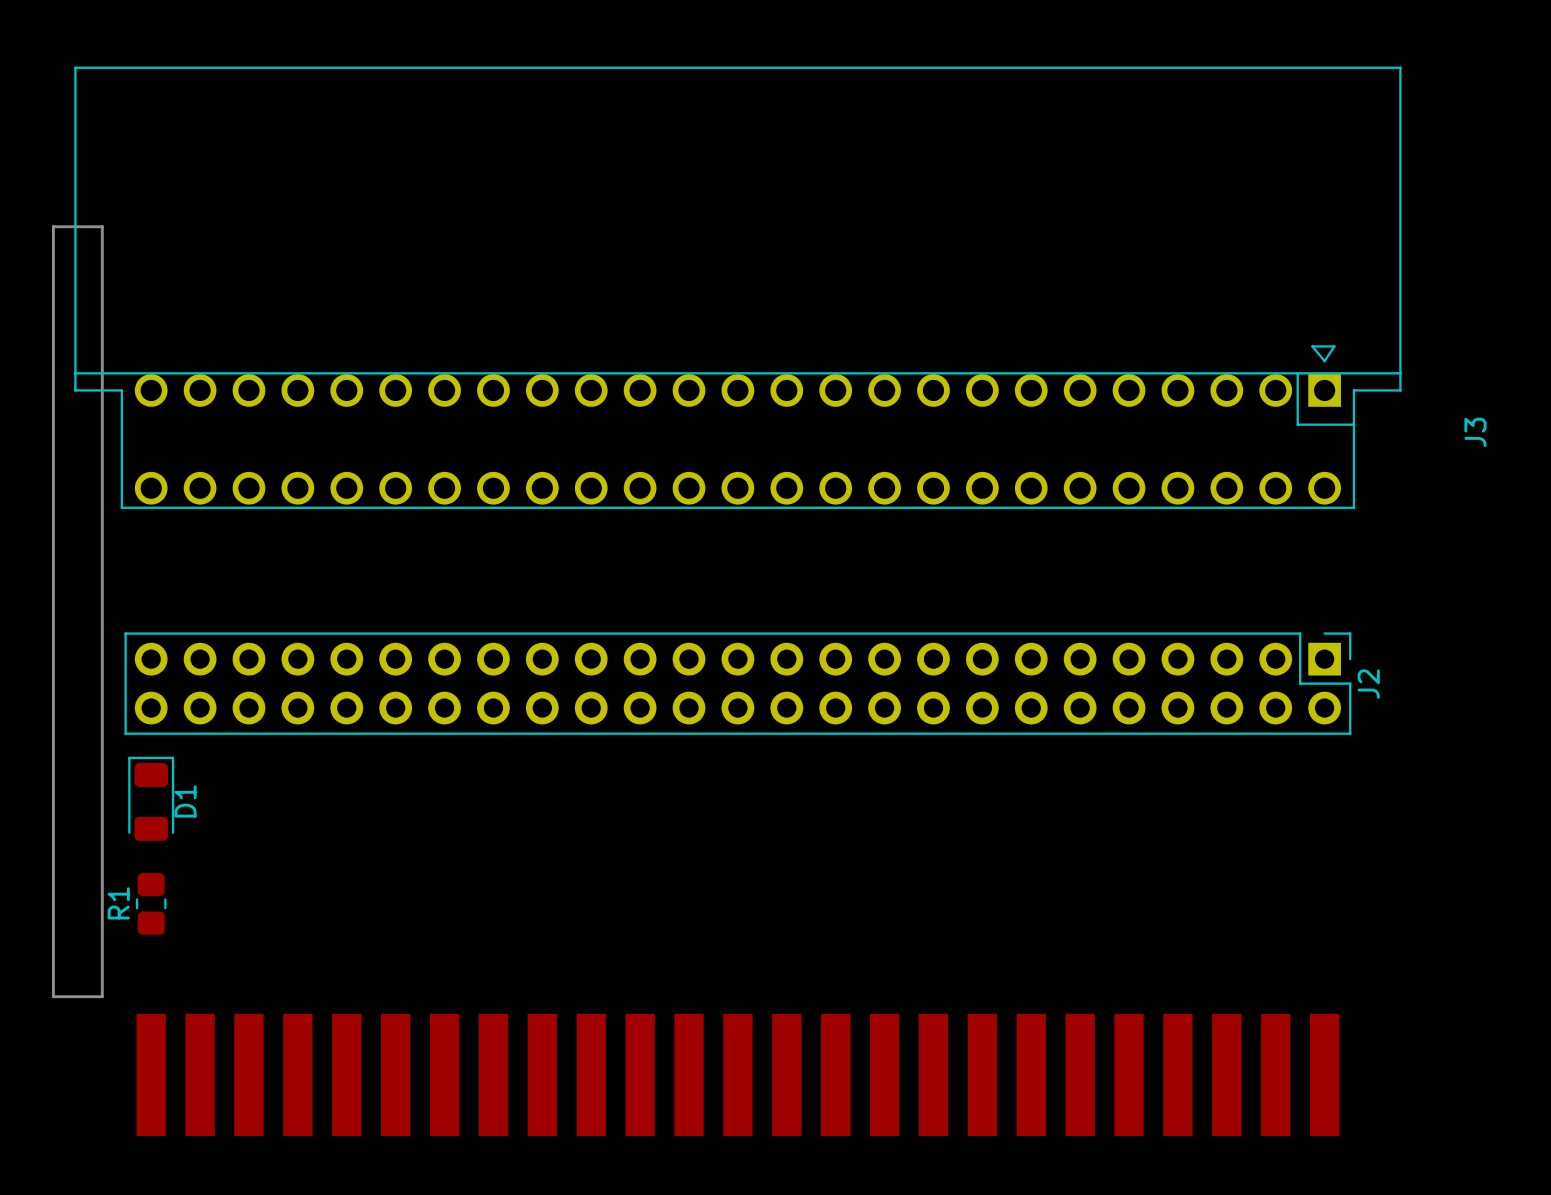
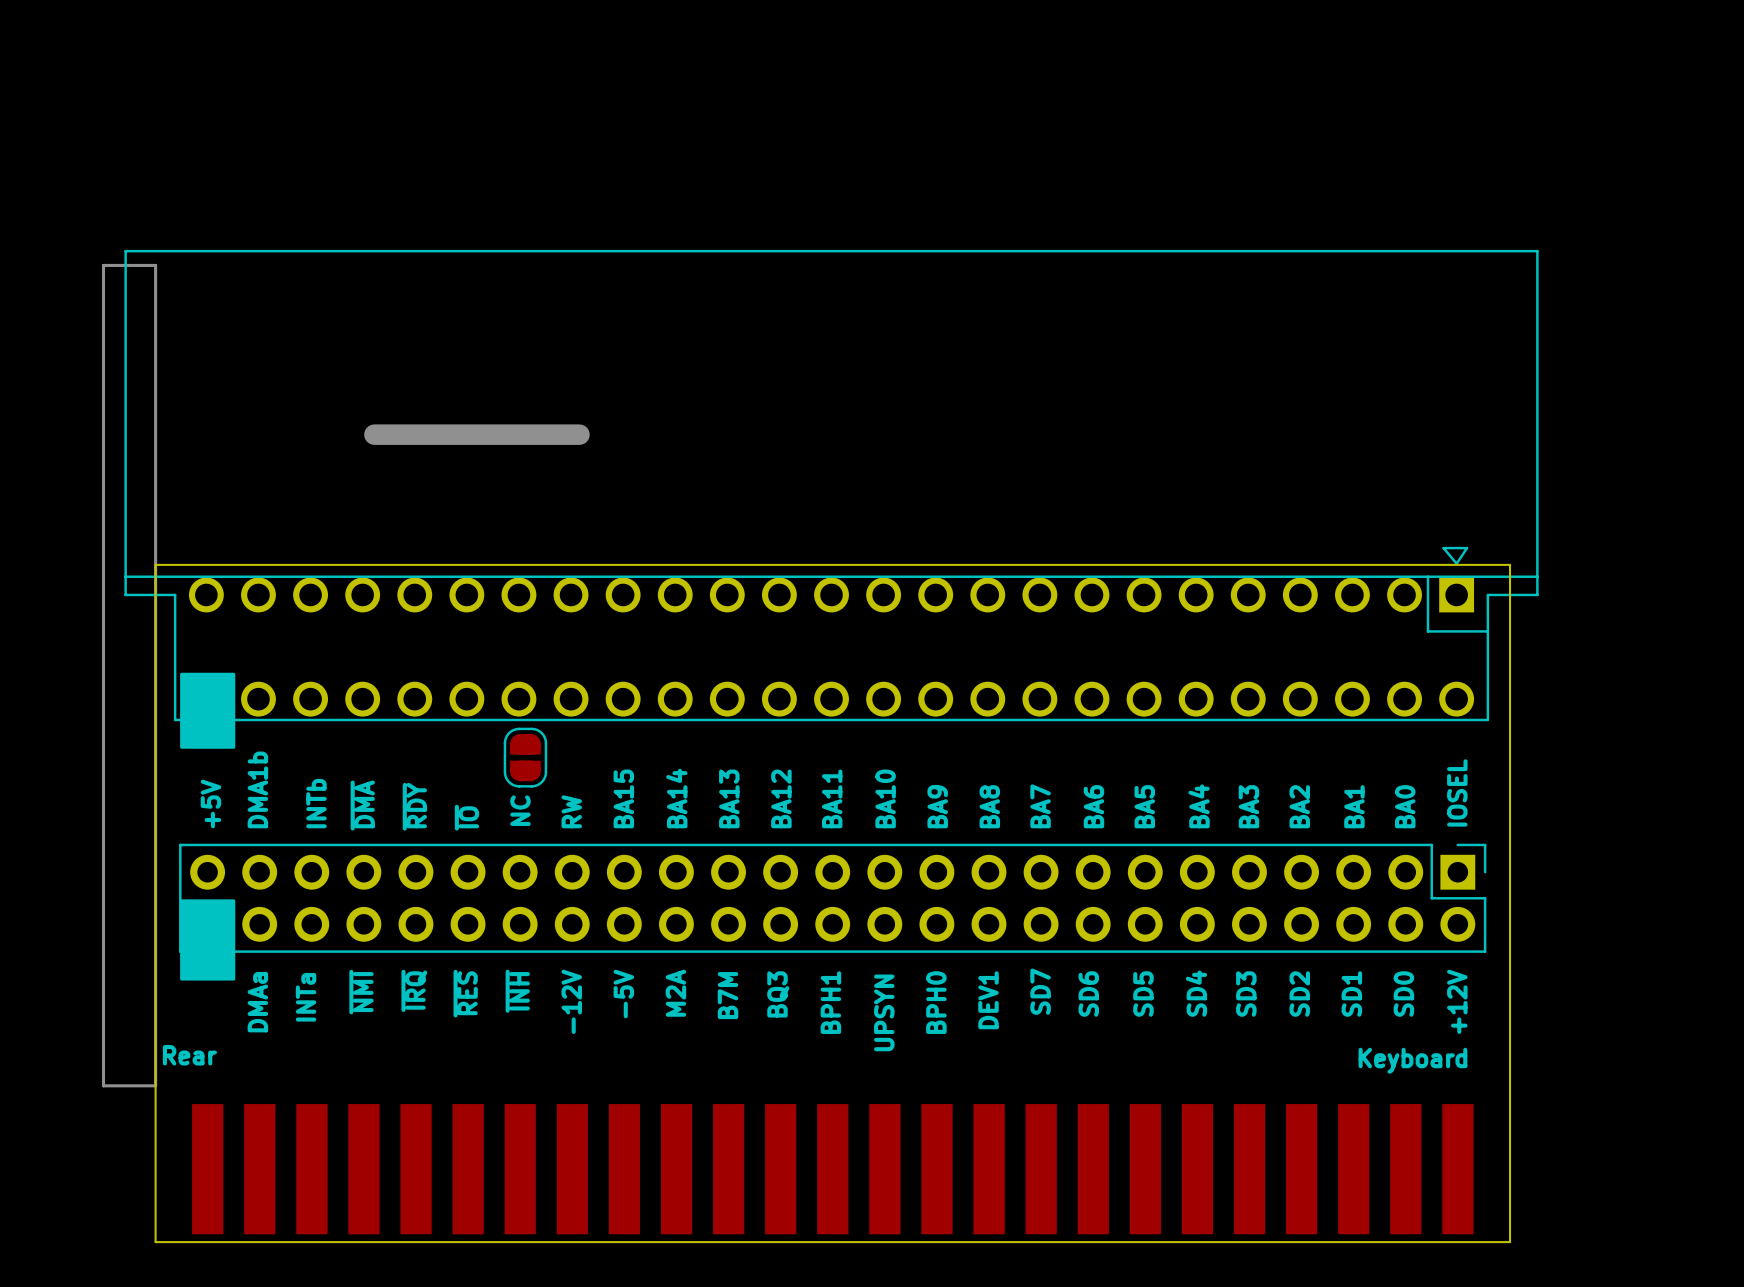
J3: (737, 287) -> none
line: none -> (374, 434) (579, 434)
part: none -> (831, 485)
board edge: none -> (155, 564) (1510, 564) (1510, 1242) (155, 1242) (155, 564)
drawing: none -> [180, 672, 236, 749]
J2: (737, 683) -> none
part: none -> (525, 757)
text: none -> DMA1b (257, 789)
text: none -> IOSEL (1457, 792)
text: none -> BA15 (623, 798)
text: none -> BA14 (676, 798)
text: none -> BA13 (729, 798)
text: none -> BA12 (781, 798)
text: none -> BA11 (832, 798)
text: none -> BA10 (885, 798)
text: none -> INTb (316, 803)
text: none -> +5V (210, 803)
text: none -> ~{DMA} (362, 805)
text: none -> ~{RDY} (414, 806)
text: none -> BA9 (937, 806)
text: none -> BA8 (989, 806)
text: none -> BA7 (1040, 806)
text: none -> BA6 (1093, 806)
text: none -> BA5 (1144, 806)
text: none -> BA4 (1199, 806)
text: none -> BA3 (1248, 806)
text: none -> BA2 (1299, 806)
text: none -> BA1 (1354, 806)
text: none -> BA0 (1405, 806)
text: none -> NC (520, 810)
text: none -> RW (571, 811)
text: none -> ~{IO} (466, 817)
D1: (151, 798) -> none
part: none -> (832, 898)
drawing: none -> [180, 899, 236, 981]
R1: (151, 903) -> none
text: none -> ~{IRQ} (414, 990)
text: none -> ~{INH} (517, 991)
text: none -> ~{NMI} (361, 992)
text: none -> SD7 (1040, 991)
text: none -> M2A (675, 993)
text: none -> ~{RES} (465, 993)
text: none -> -5V (623, 994)
text: none -> BQ3 (778, 994)
text: none -> SD6 (1088, 994)
text: none -> SD5 (1143, 994)
text: none -> SD4 (1196, 993)
text: none -> SD3 (1246, 994)
text: none -> SD2 (1299, 994)
text: none -> SD1 (1351, 994)
text: none -> SD0 (1403, 994)
text: none -> B7M (728, 995)
text: none -> INTa (306, 997)
text: none -> DEV1 (988, 1000)
text: none -> -12V (571, 1001)
text: none -> +12V (1457, 1001)
text: none -> DMAa (257, 1002)
text: none -> BPH1 (830, 1002)
text: none -> BPH0 (936, 1002)
text: none -> UPSYN (884, 1012)
text: none -> Rear (189, 1055)
text: none -> Keyboard (1412, 1060)

